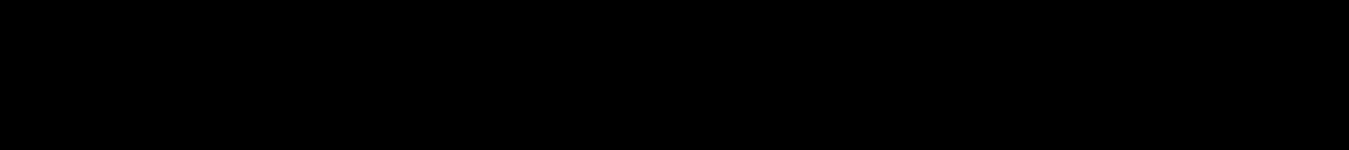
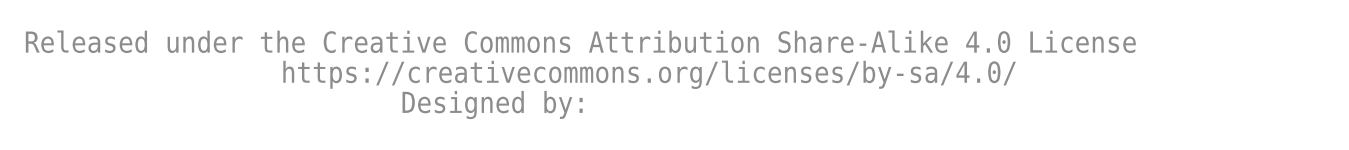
drawing: none -> [25, 30, 1136, 120]

